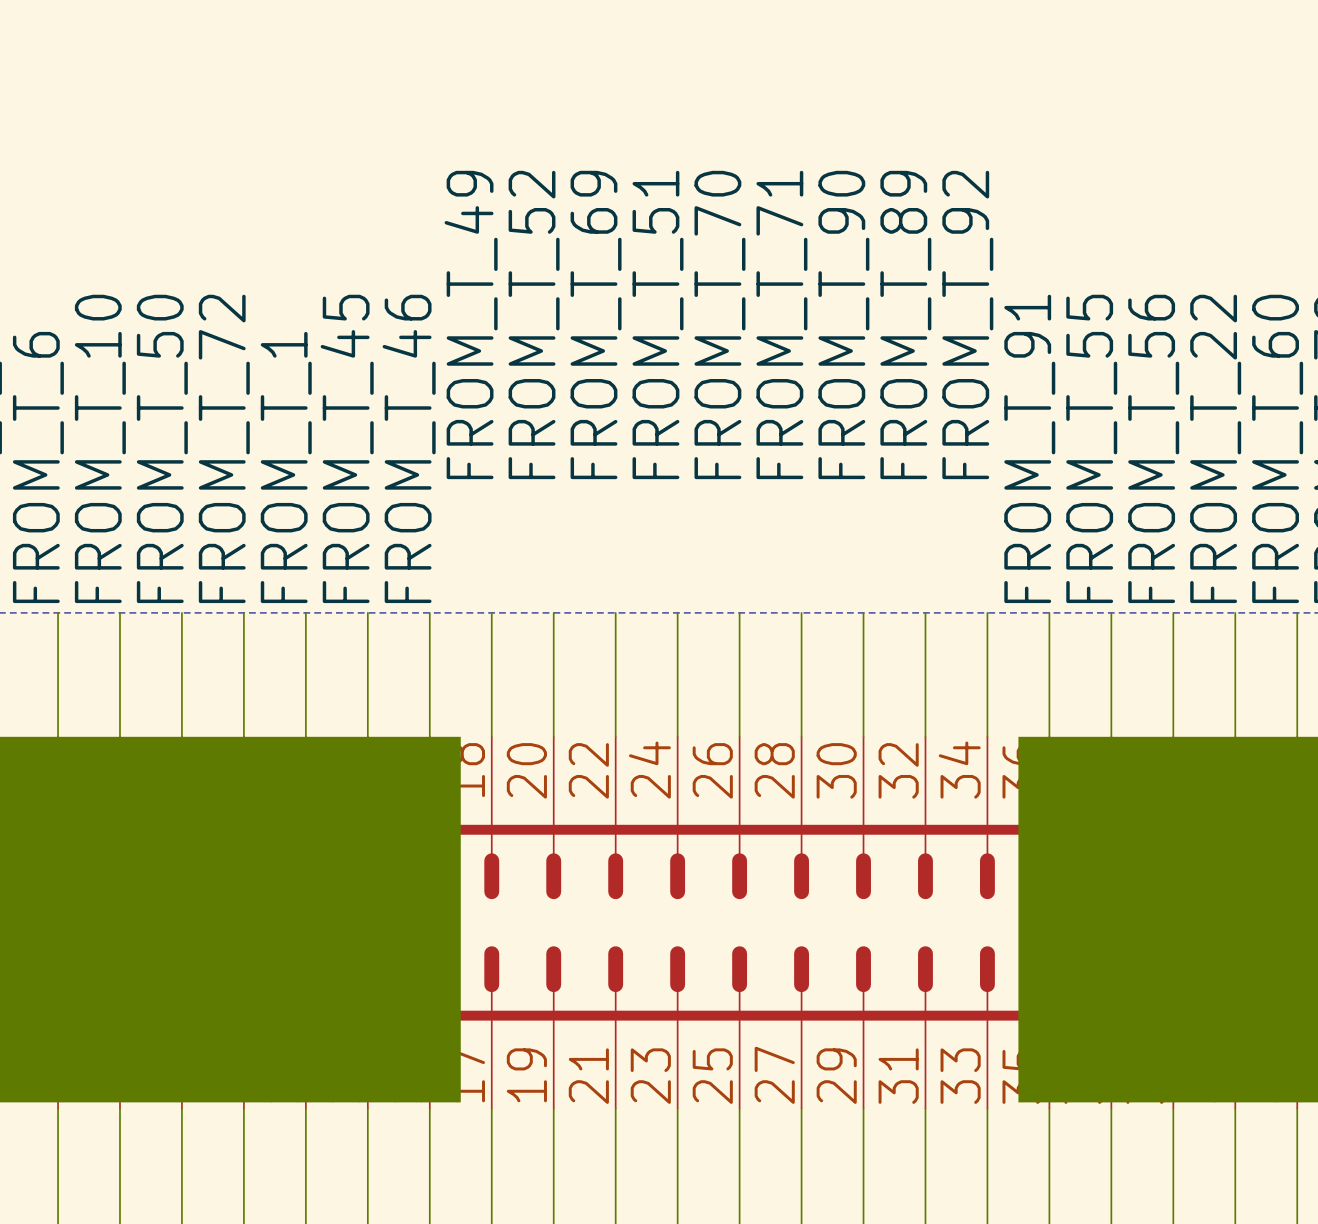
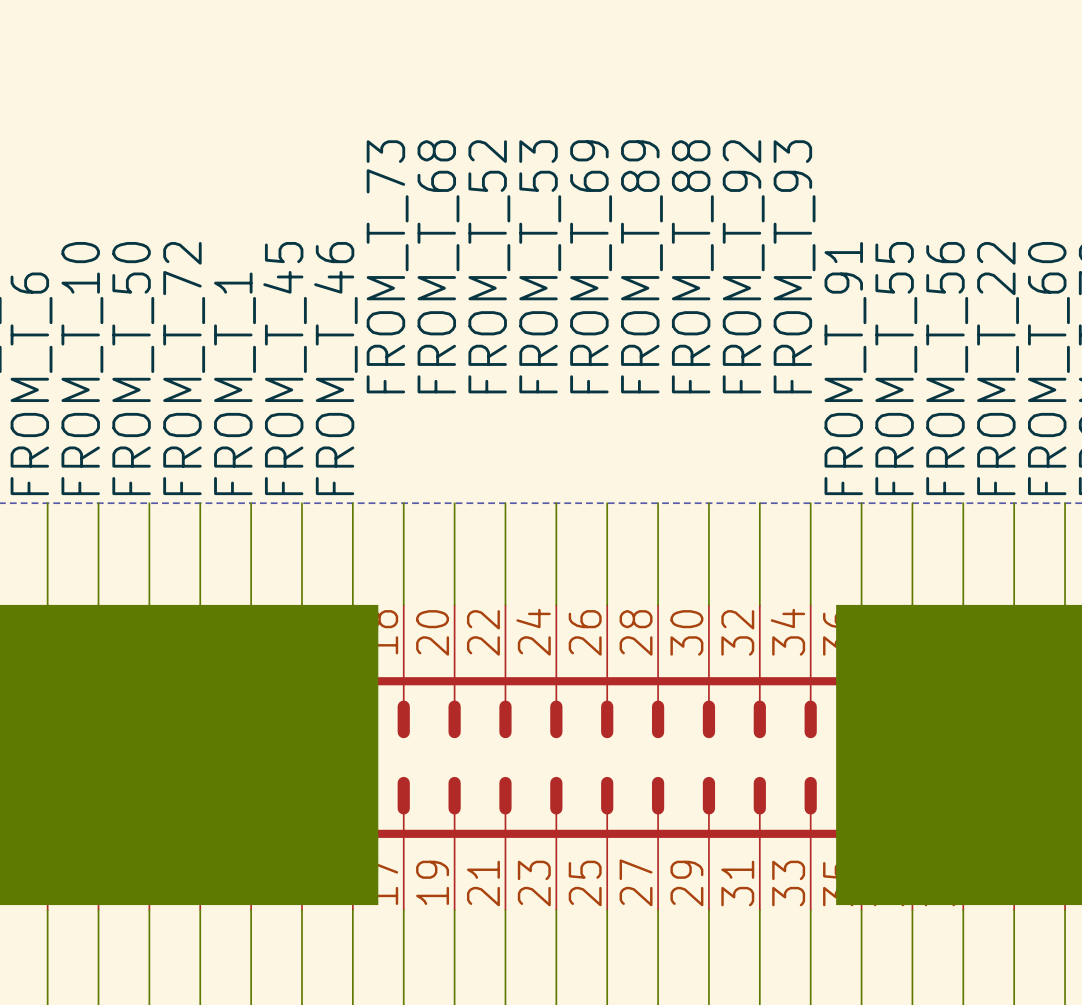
label: FROM_T_49 (471, 324) -> FROM_T_73 (387, 266)
label: FROM_T_52 (534, 324) -> FROM_T_68 (438, 266)
label: FROM_T_69 (596, 324) -> FROM_T_52 (489, 266)
label: FROM_T_51 (658, 324) -> FROM_T_53 (540, 266)
label: FROM_T_70 (719, 324) -> FROM_T_69 (591, 266)
label: FROM_T_71 (781, 324) -> FROM_T_89 (641, 266)
label: FROM_T_90 (843, 324) -> FROM_T_88 (692, 266)
label: FROM_T_89 (905, 324) -> FROM_T_92 (743, 266)
label: FROM_T_92 (967, 324) -> FROM_T_93 (794, 266)

